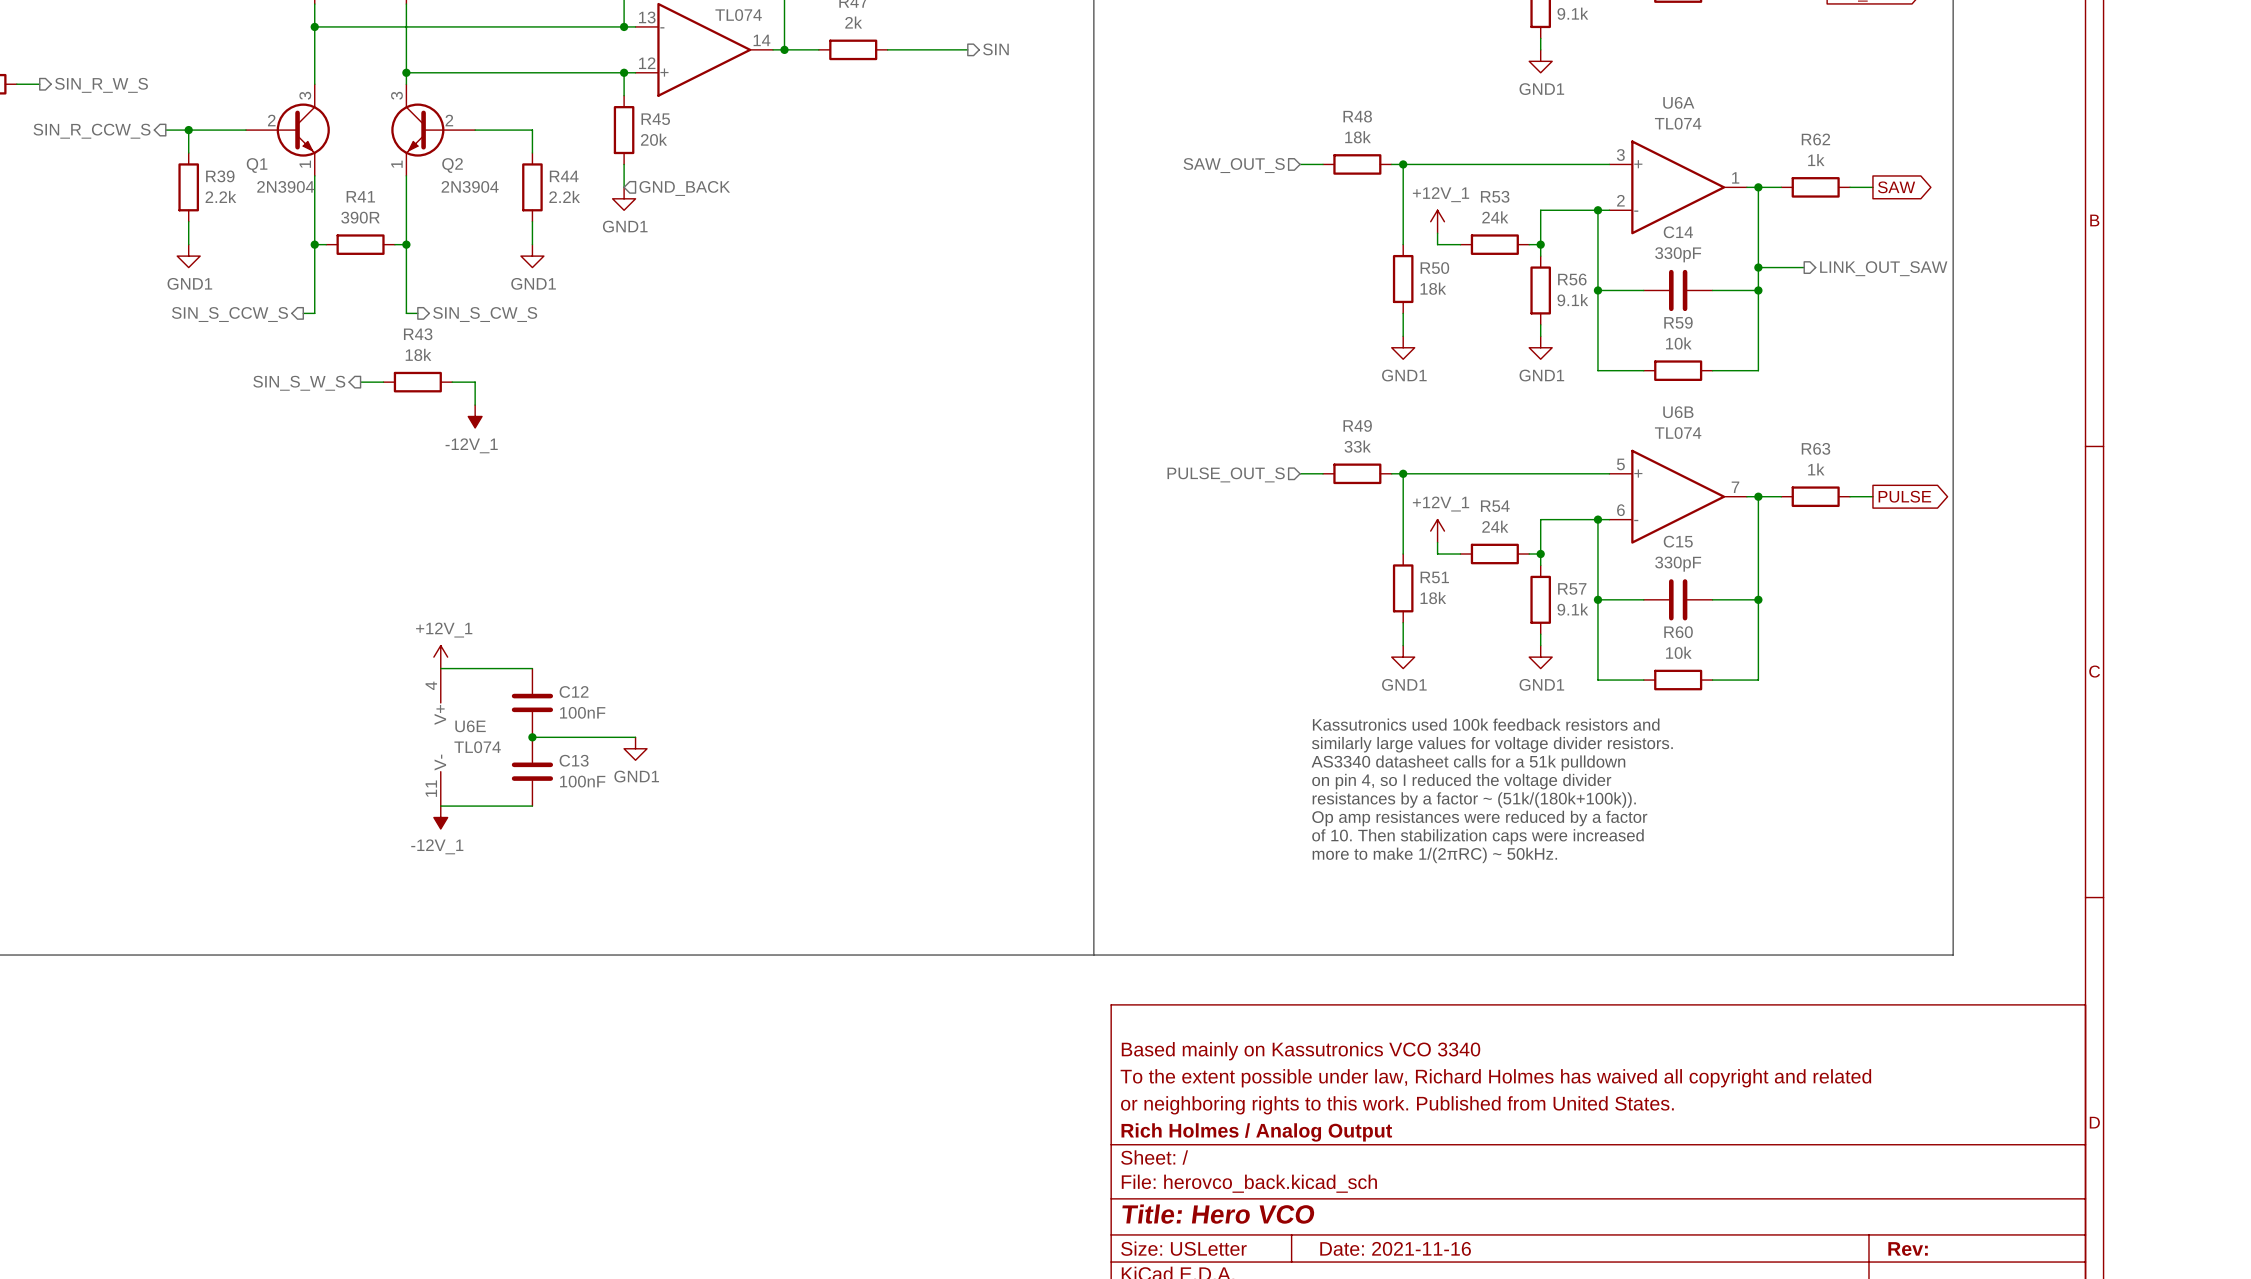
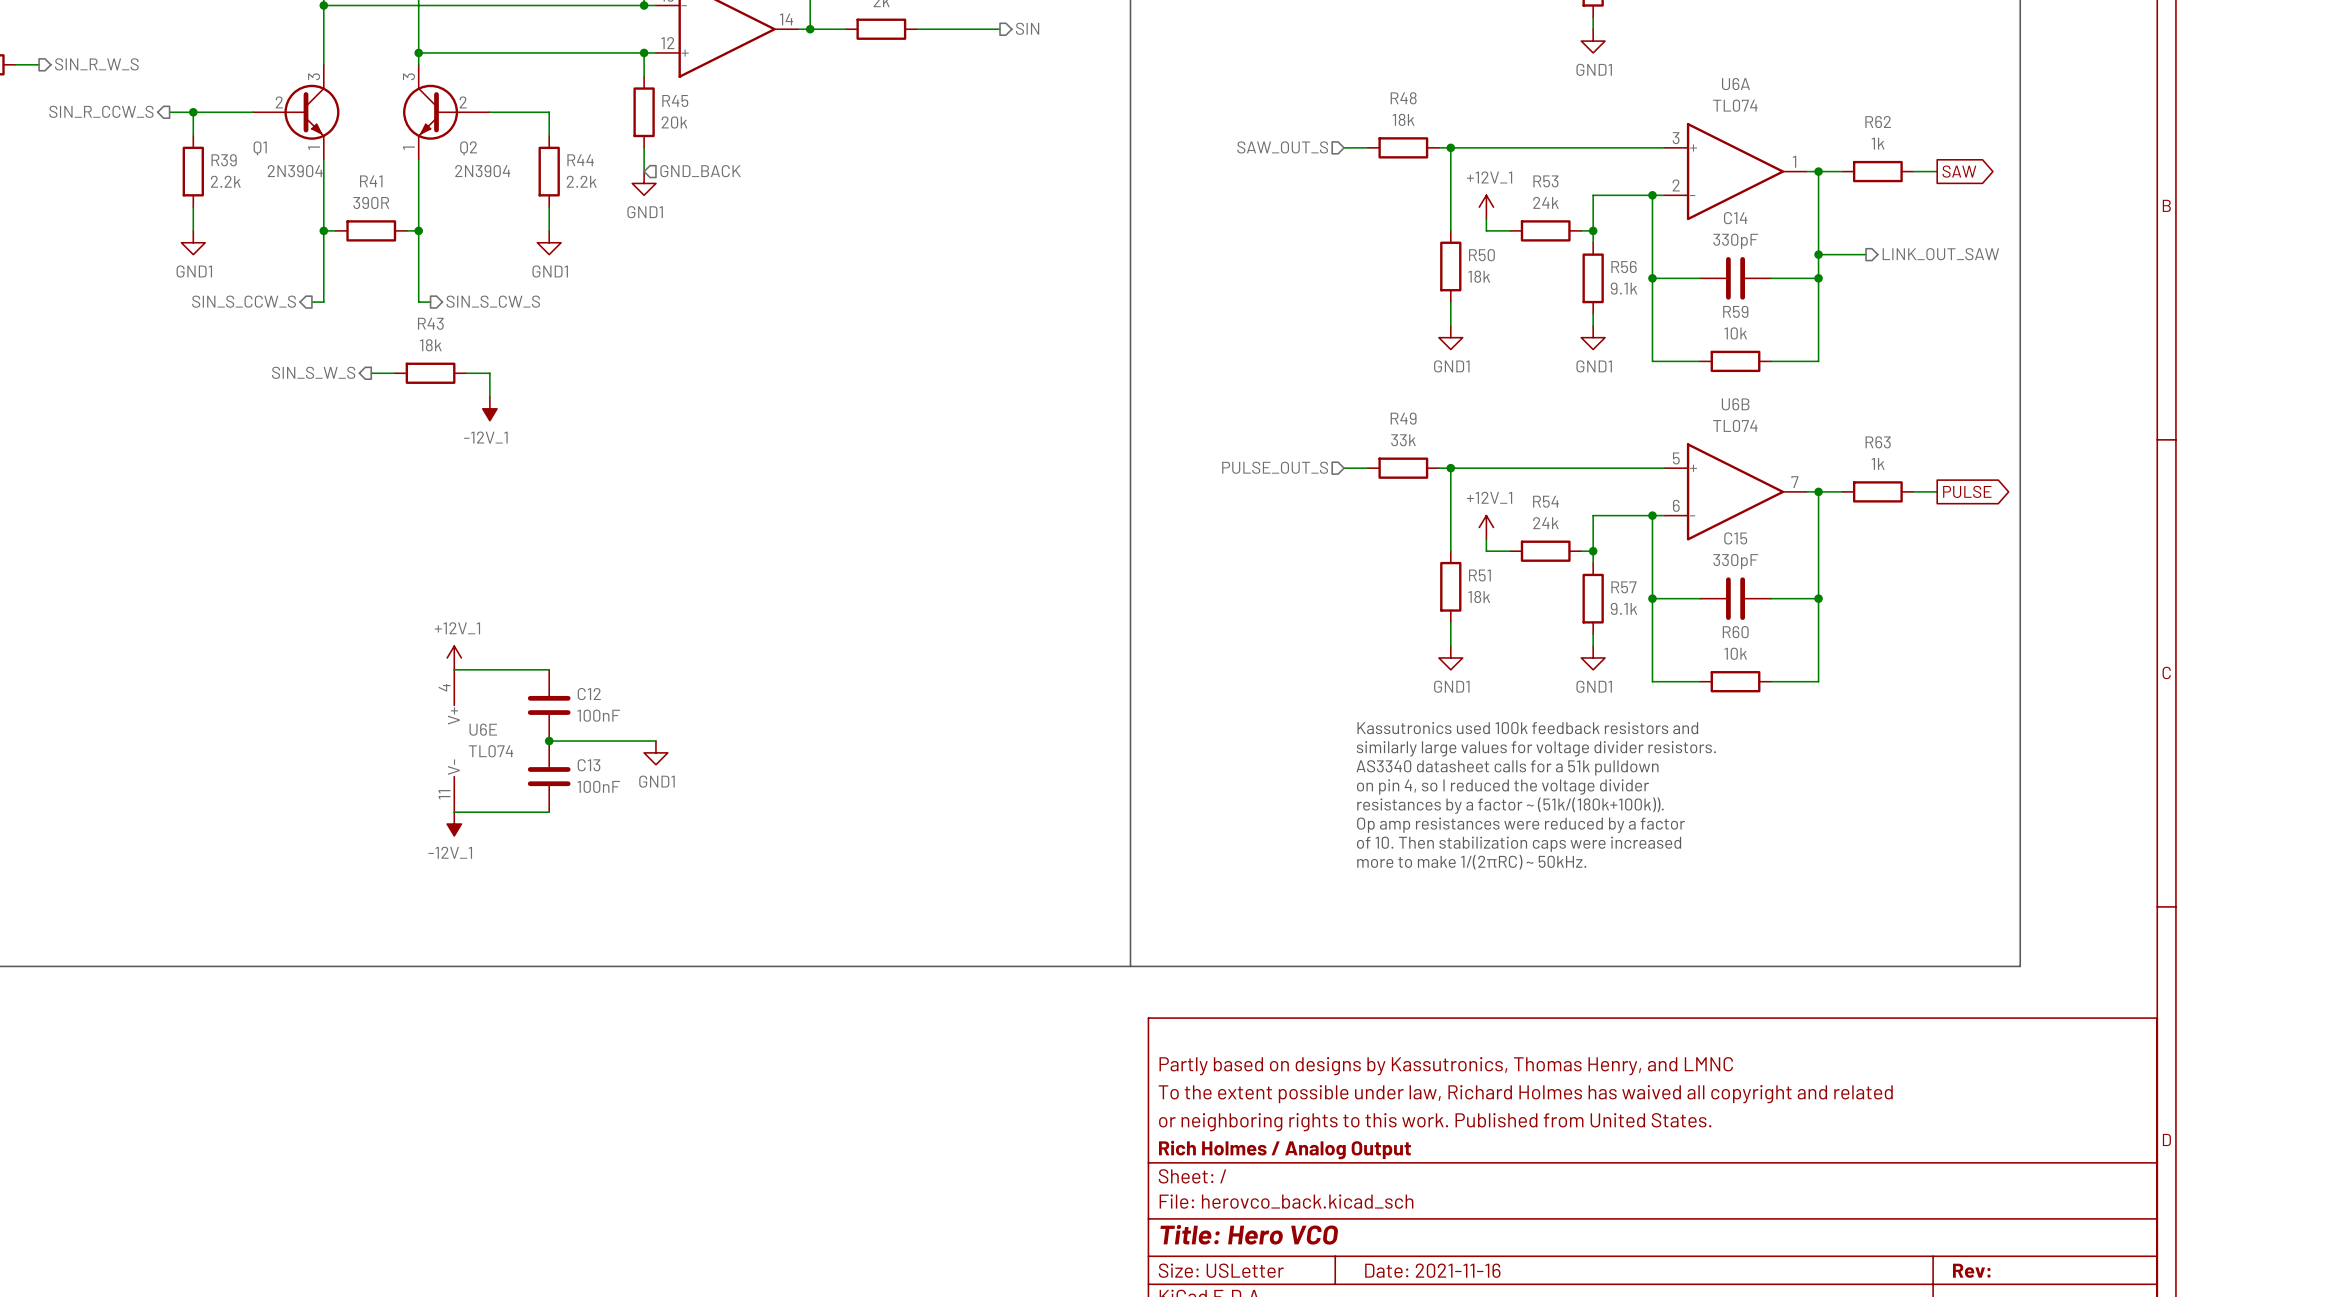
title block: Based mainly on Kassutronics VCO 3340 (1301, 1051) -> Partly based on designs by Kassutronics, Thomas Henry, and LMNC (1446, 1066)

